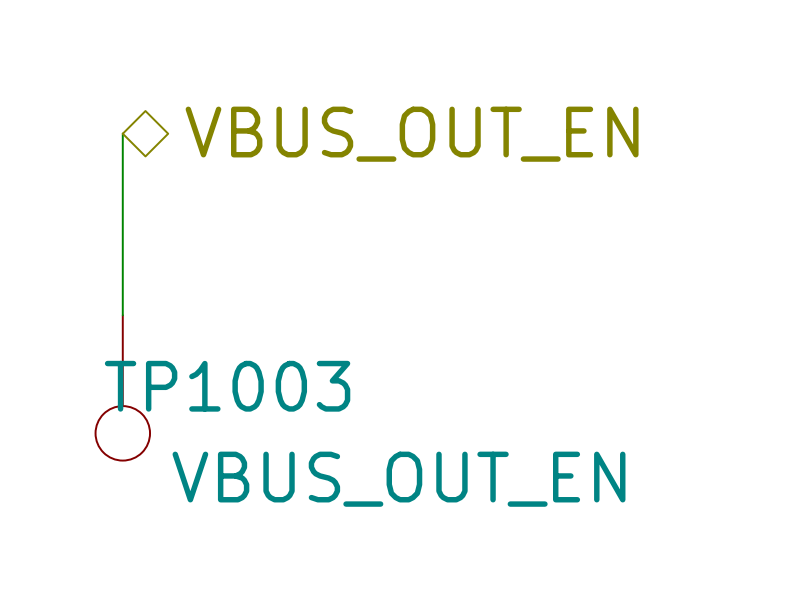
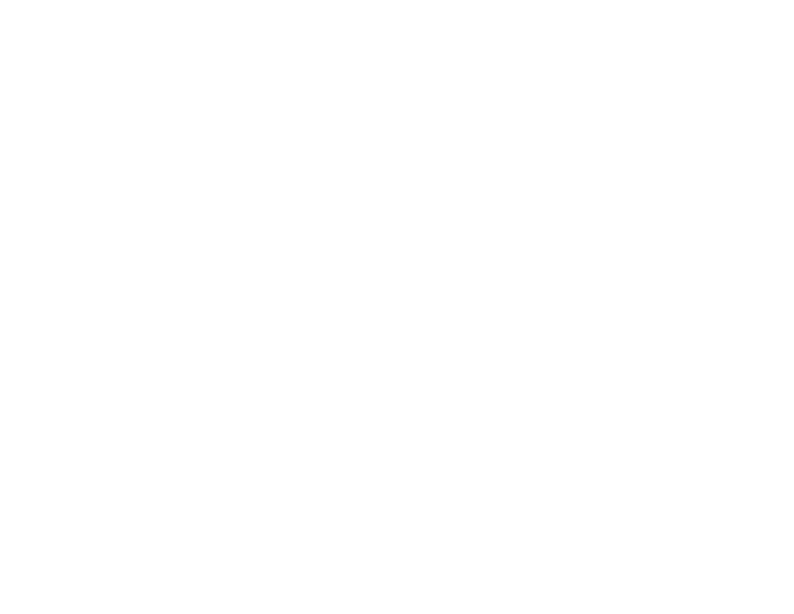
wire: (122, 133) (122, 315) -> none
hierarchical label: VBUS_OUT_EN (412, 134) -> none
TP1003: VBUS_OUT_EN (122, 387) -> none

